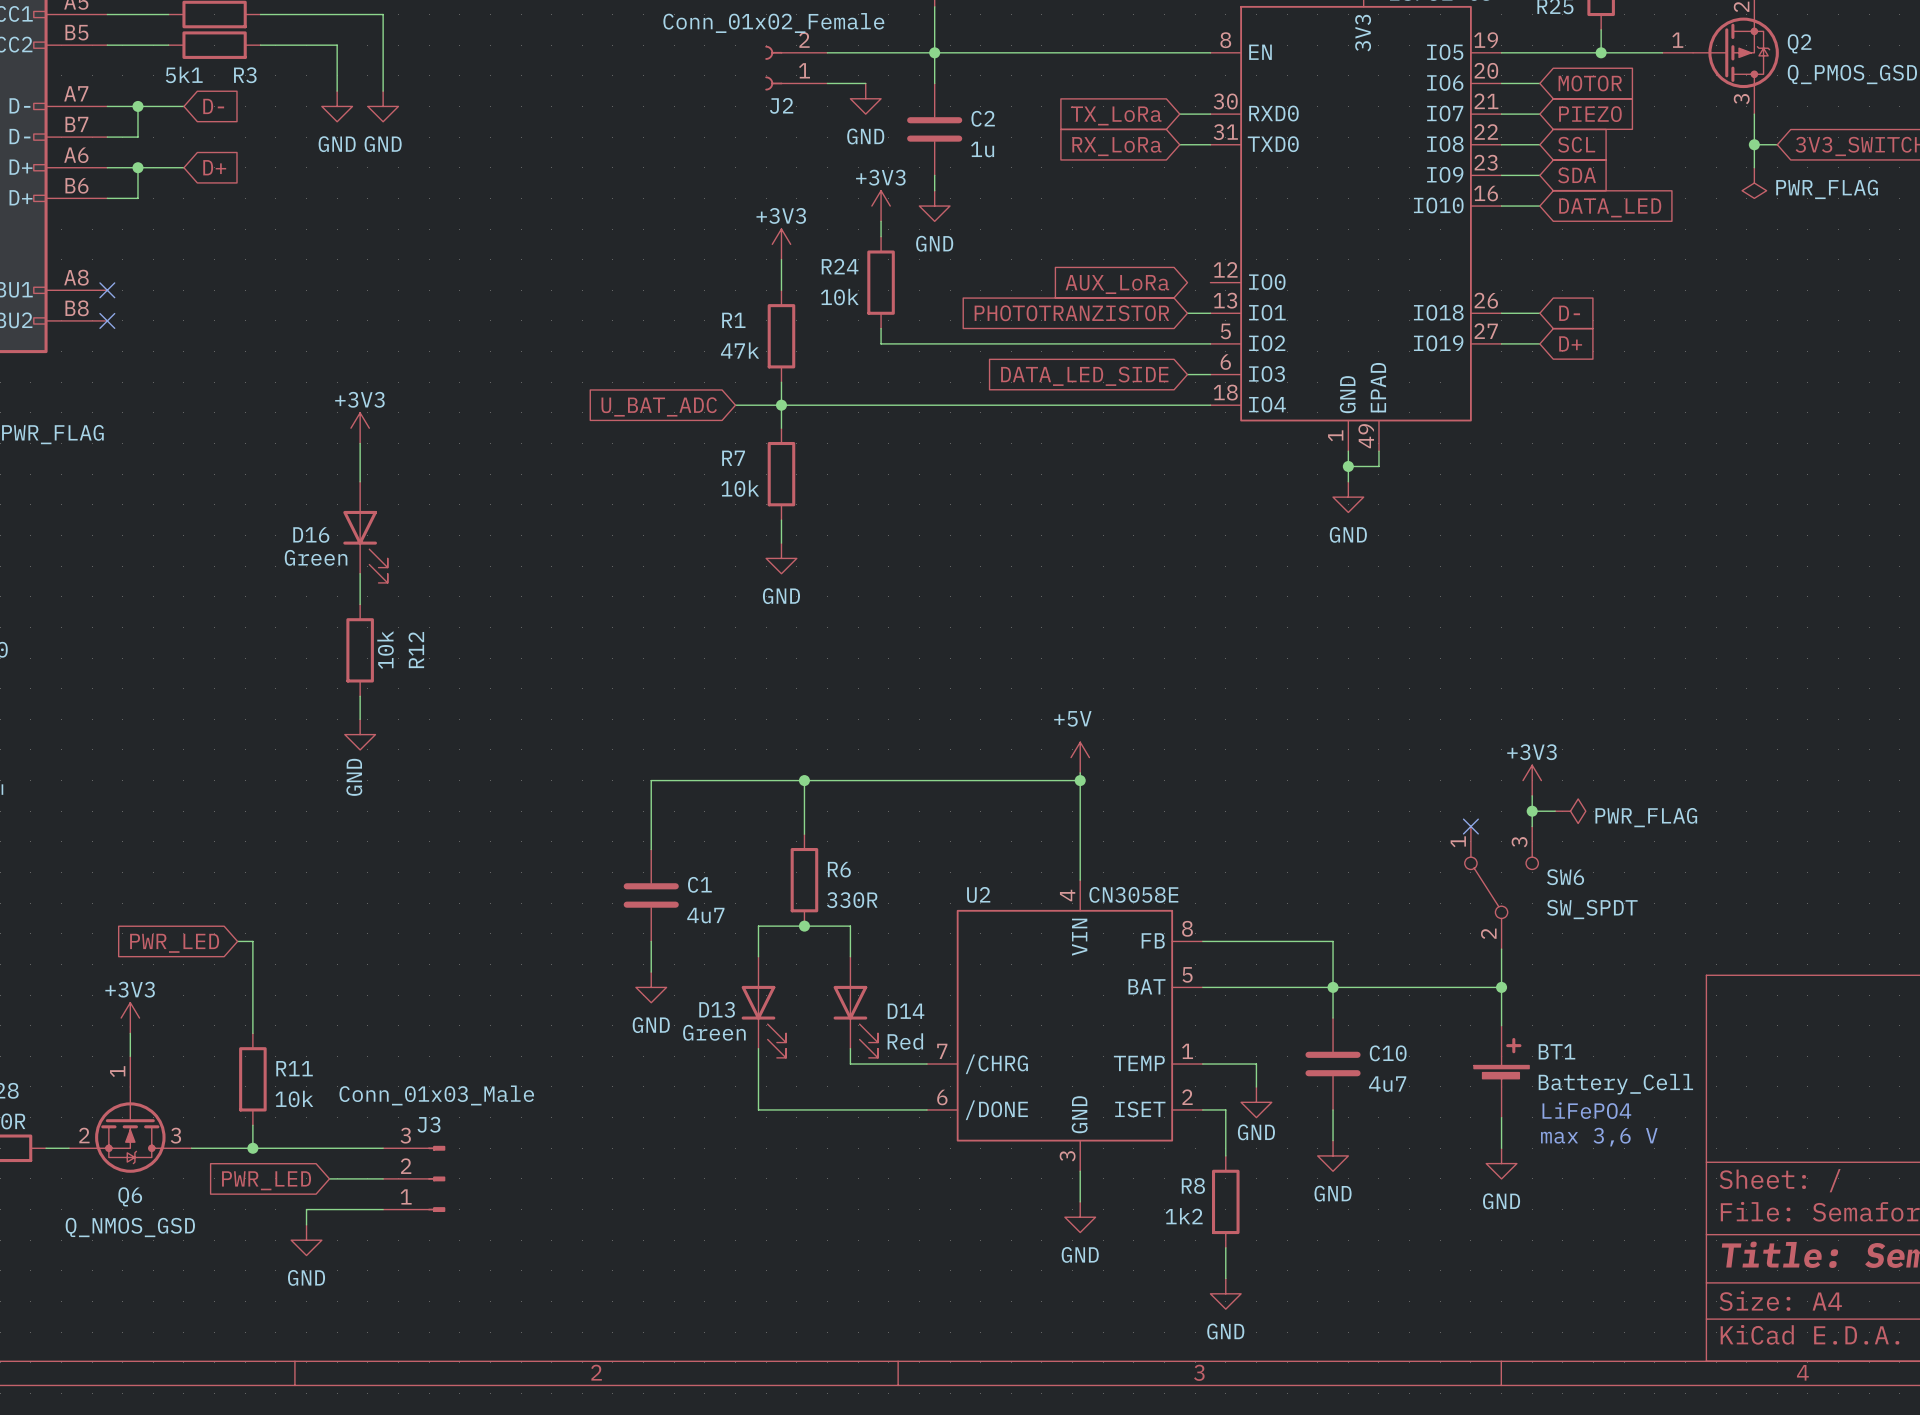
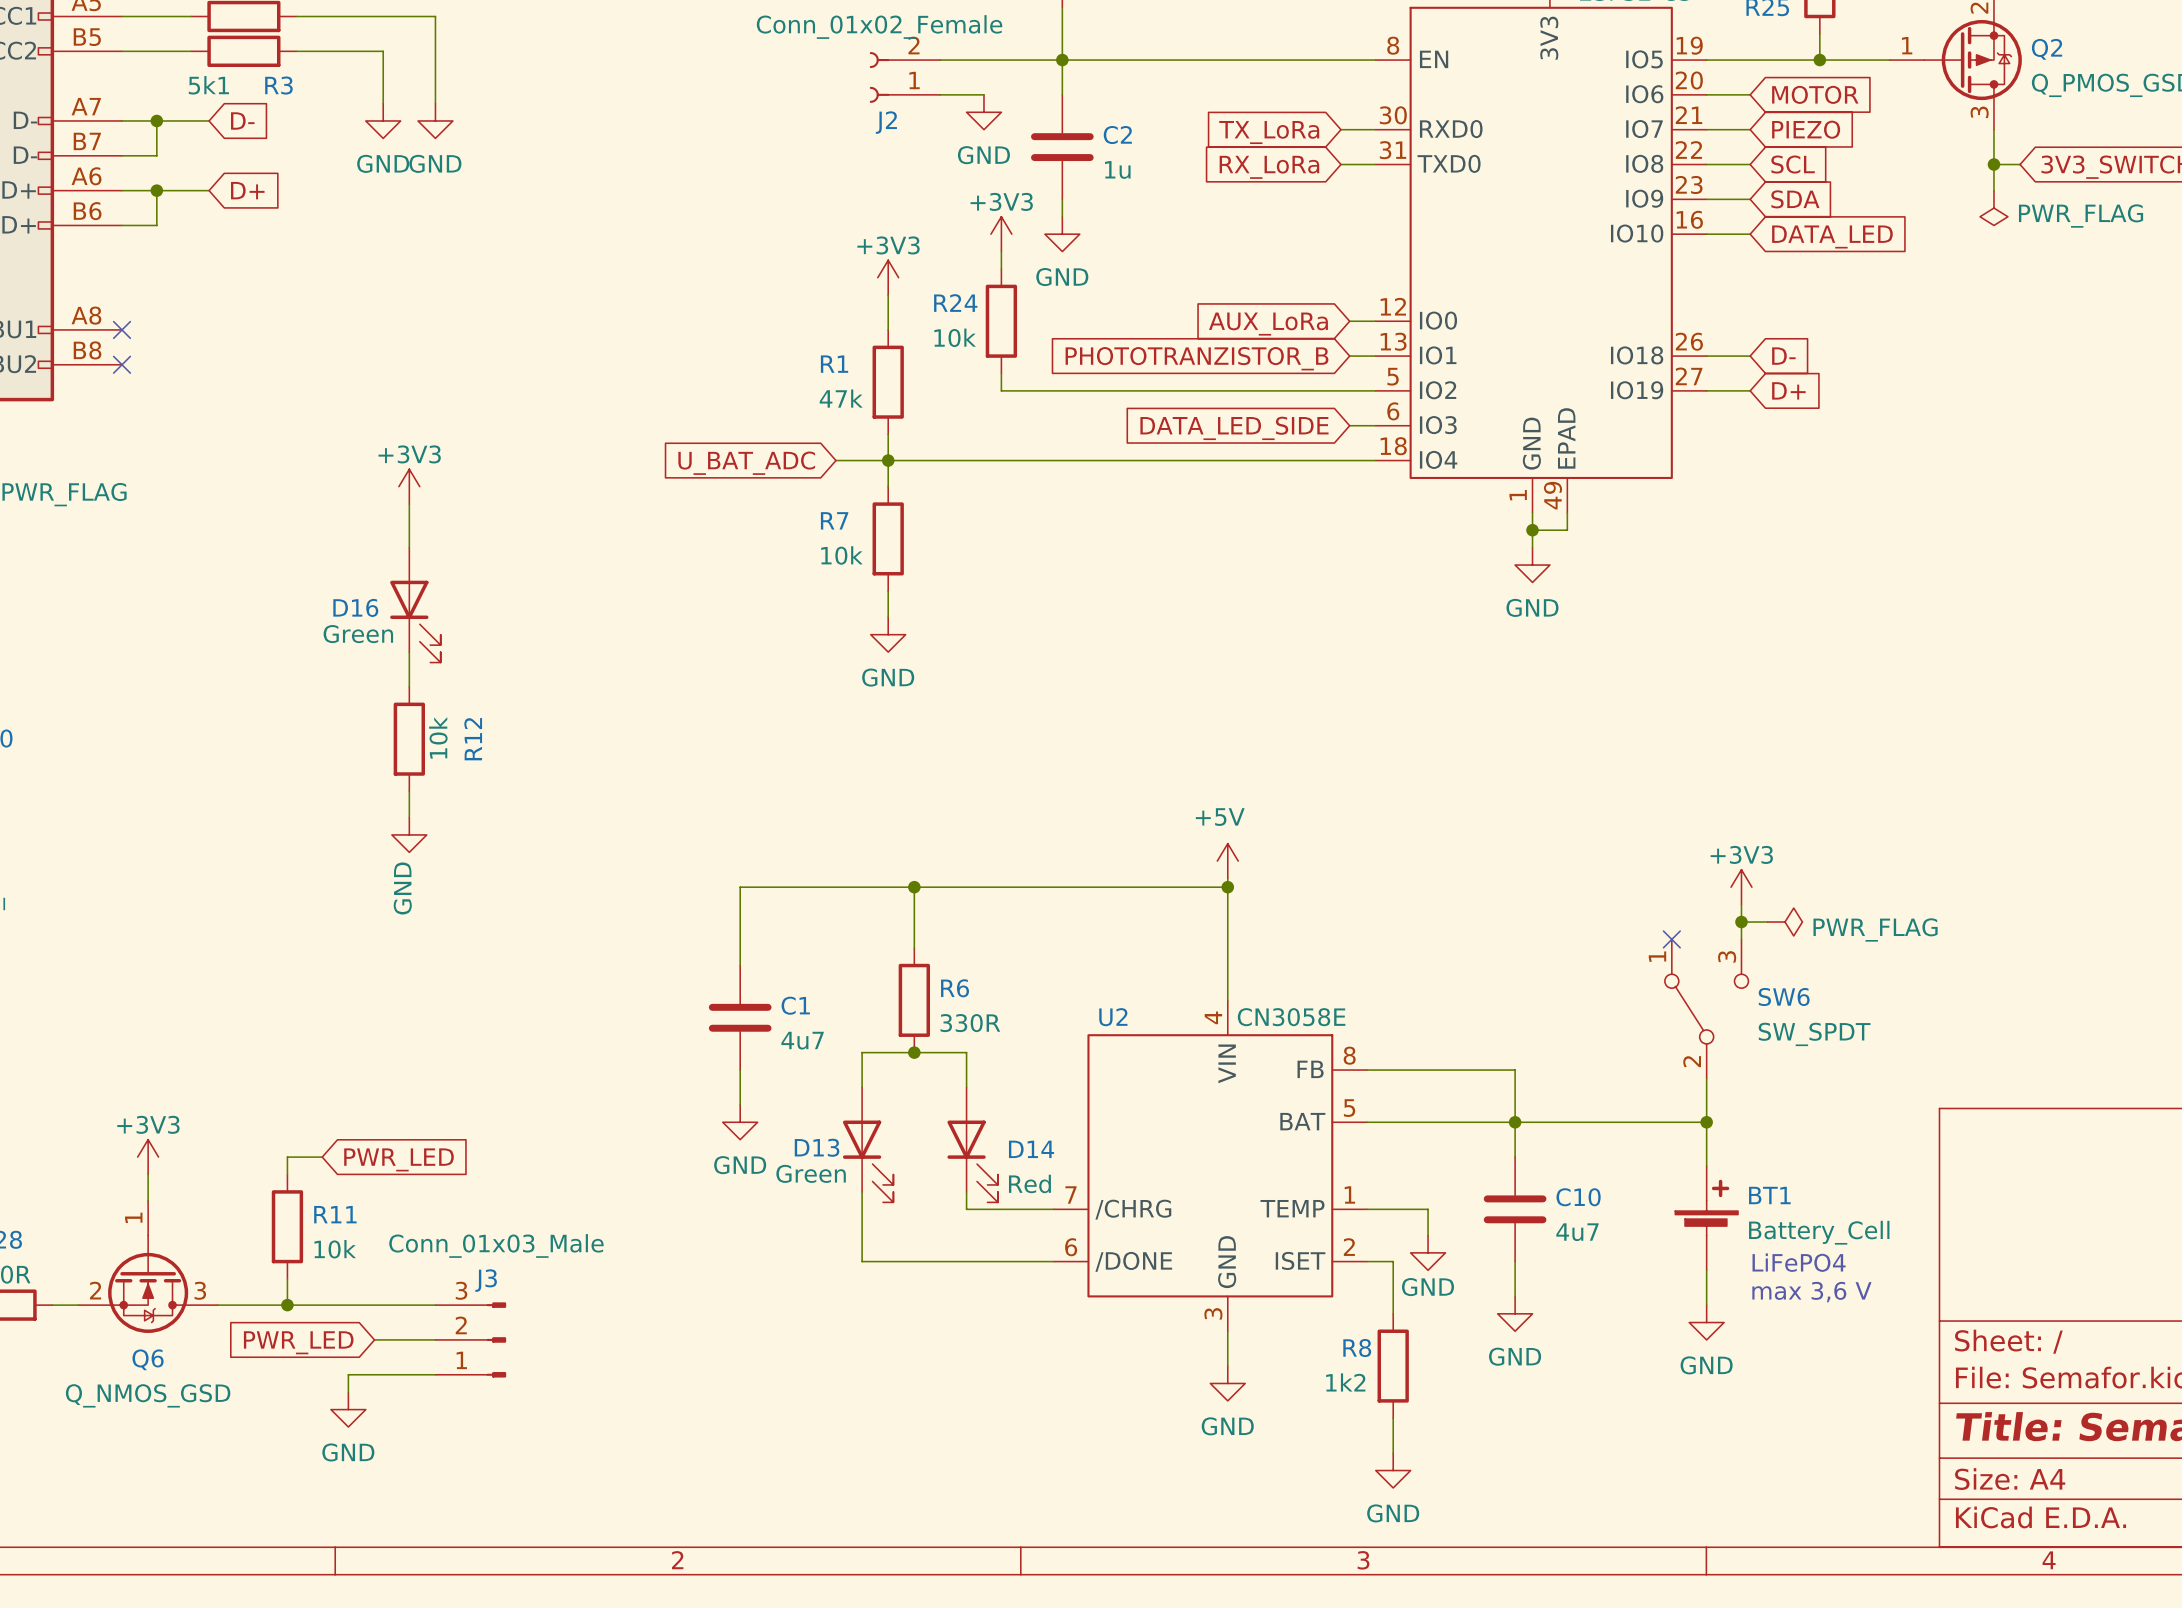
wire: none -> (1349, 321) (1375, 321)
global label: PHOTOTRANZISTOR (1071, 313) -> PHOTOTRANZISTOR_B (1196, 358)
wire: (237, 941) (252, 941) (252, 1018) -> (322, 1157) (287, 1157)
global label rotation: 0° (174, 943) -> 180° (398, 1159)
global label position: PWR_LED (174, 943) -> PWR_LED (398, 1159)

